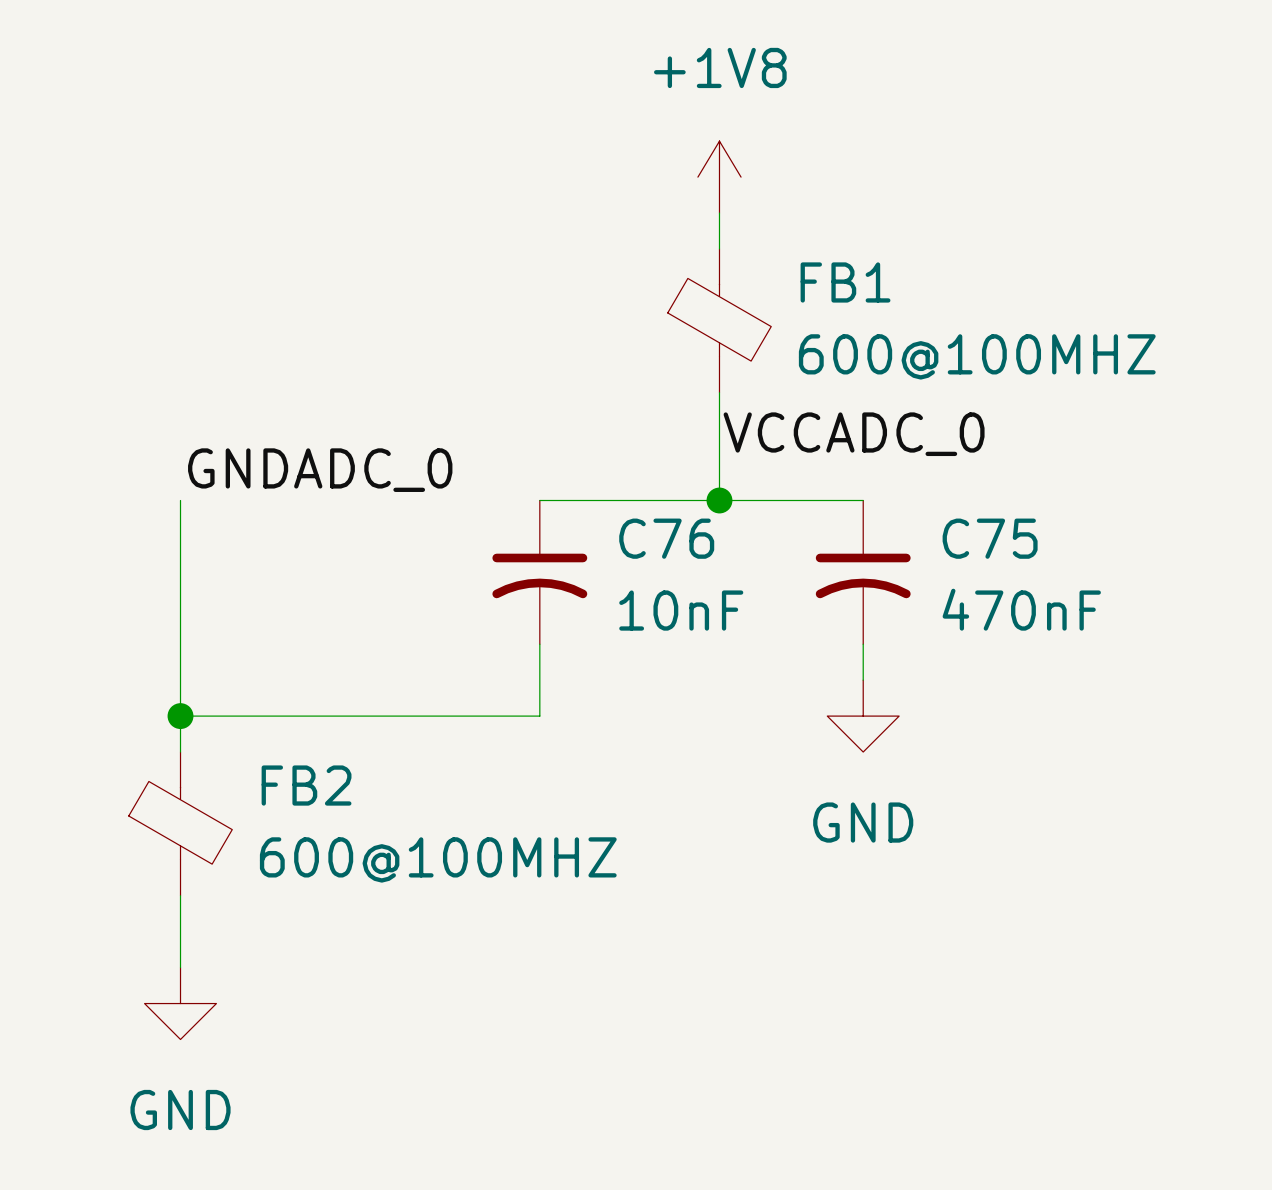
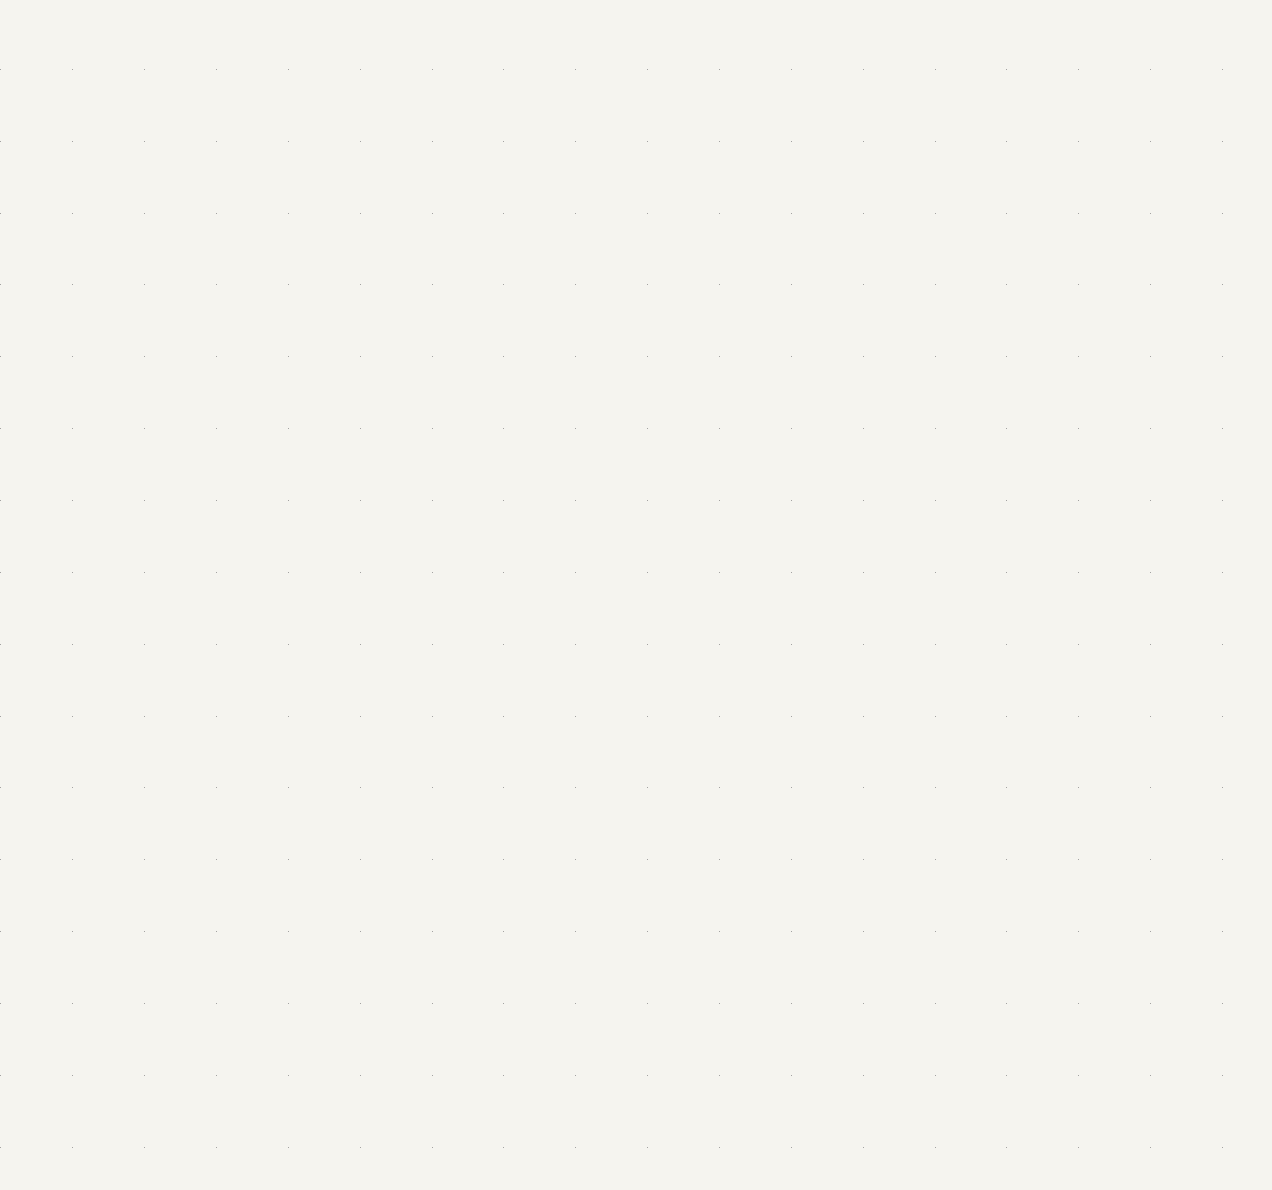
power symbol: +1V8 (719, 177) -> none
wire: (719, 213) (719, 248) -> none
FB1: 600@100MHZ (719, 320) -> none
wire: (719, 392) (719, 500) -> none
label: VCCADC_0 (854, 434) -> none
label: GNDADC_0 (320, 470) -> none
wire: (180, 500) (180, 752) -> none
wire: (539, 500) (863, 500) -> none
junction: (719, 500) -> none
C76: 10nF (539, 572) -> none
C75: 470nF (863, 572) -> none
wire: (539, 644) (539, 716) (180, 716) -> none
wire: (863, 644) (863, 680) -> none
junction: (180, 716) -> none
power symbol: GND (863, 716) -> none
FB2: 600@100MHZ (180, 823) -> none
wire: (180, 895) (180, 967) -> none
power symbol: GND (180, 1003) -> none

